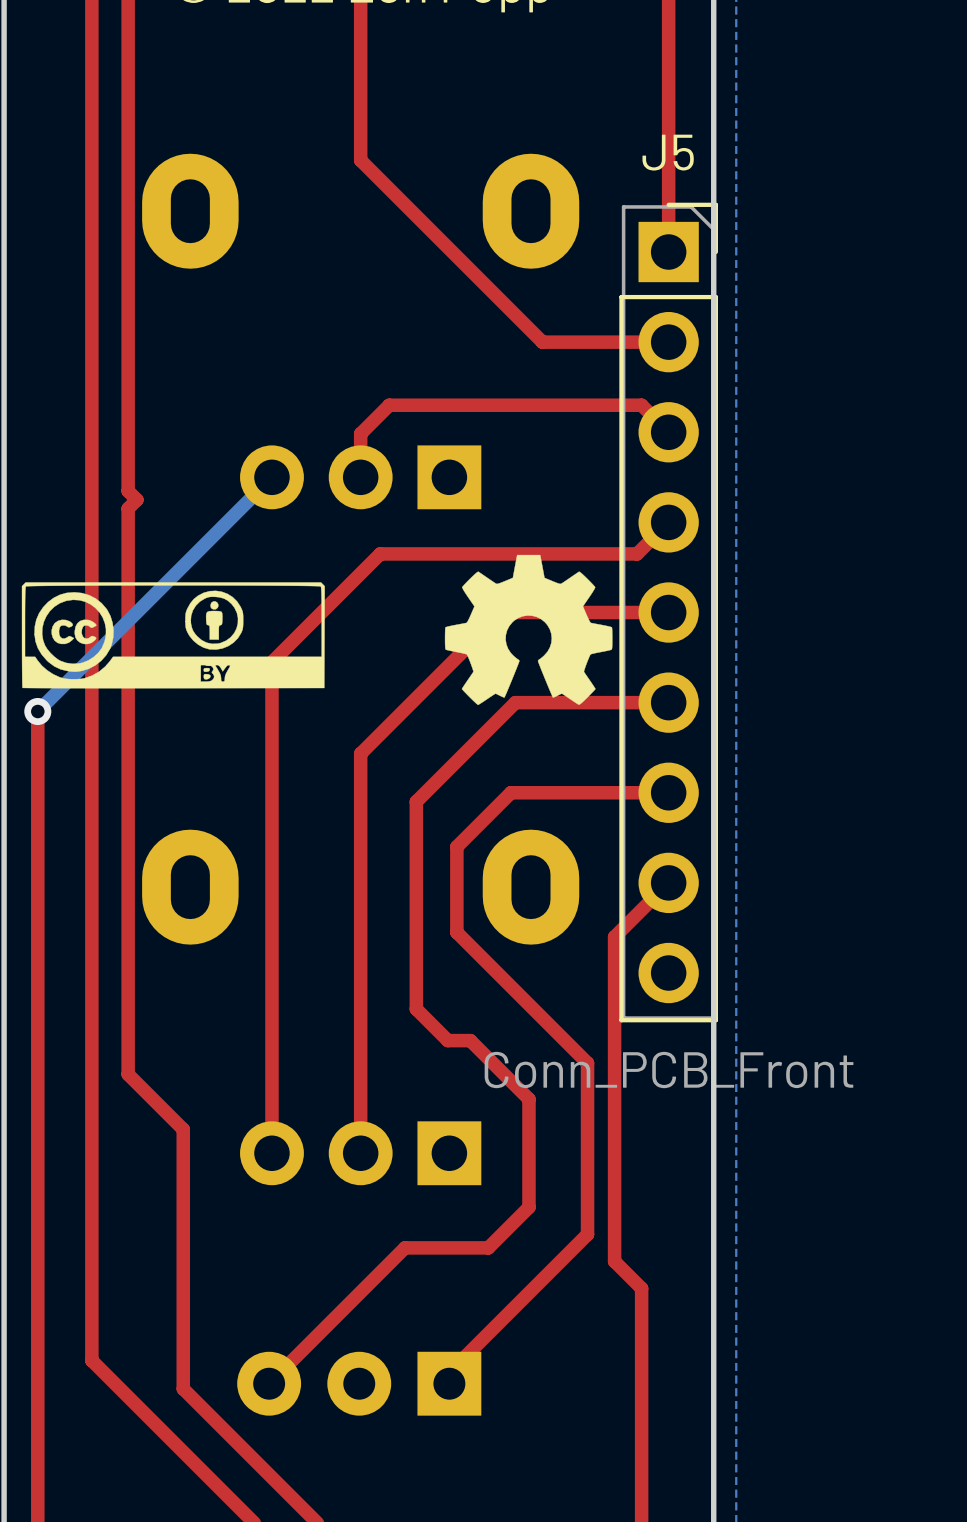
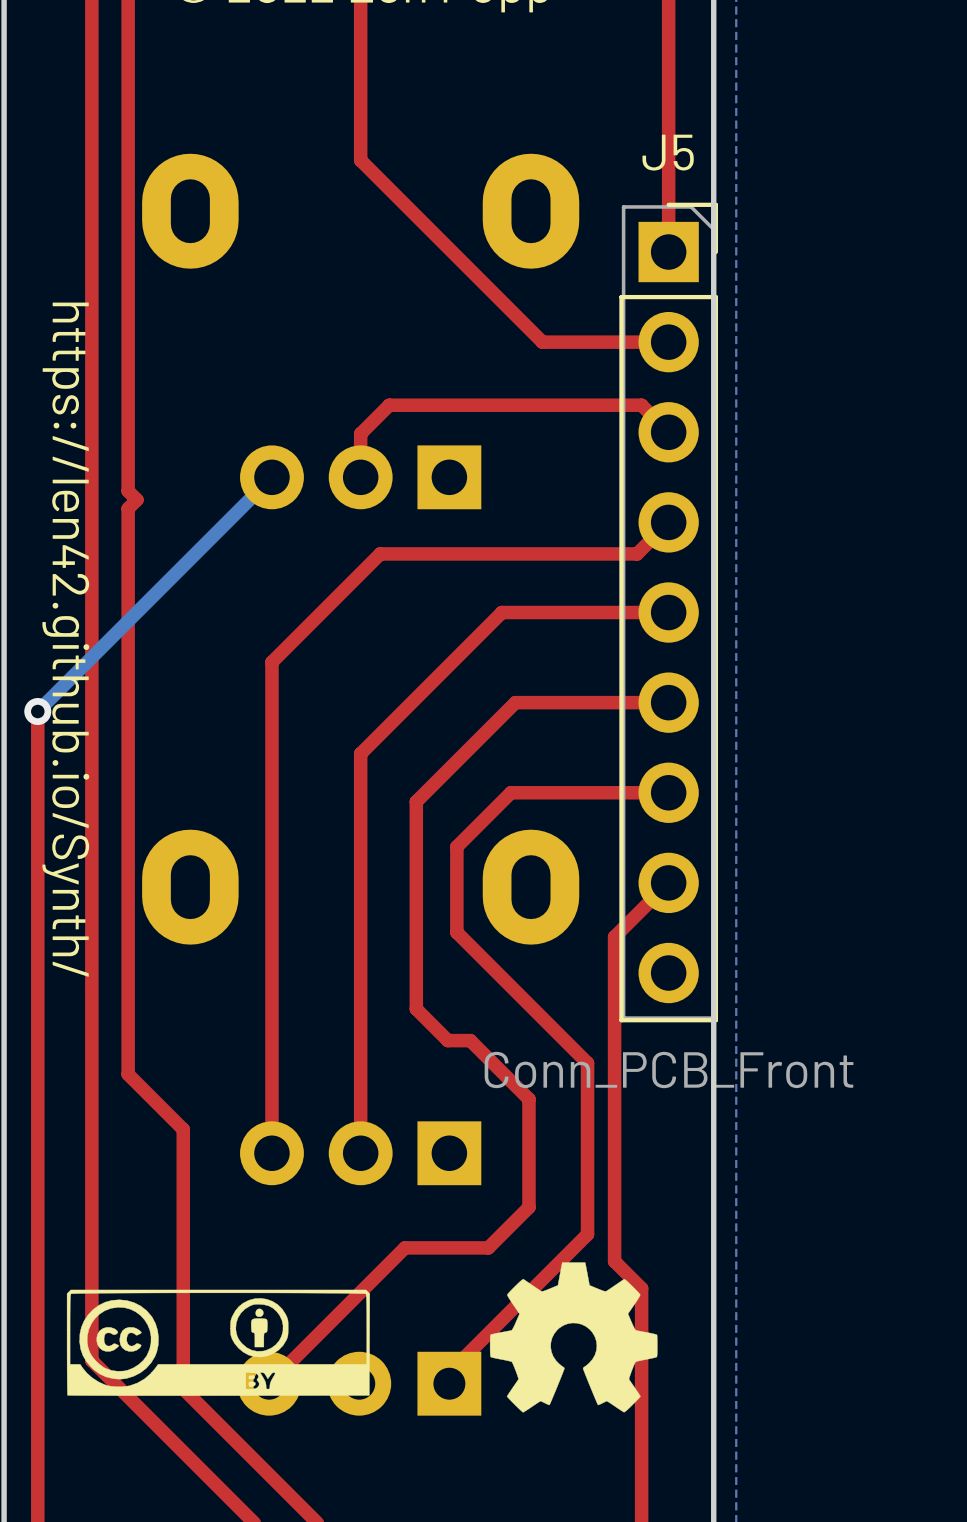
drawing position: (528, 629) -> (573, 1337)
drawing position: (173, 635) -> (218, 1342)
text: none -> https://len42.github.io/Synth/ (65, 639)

